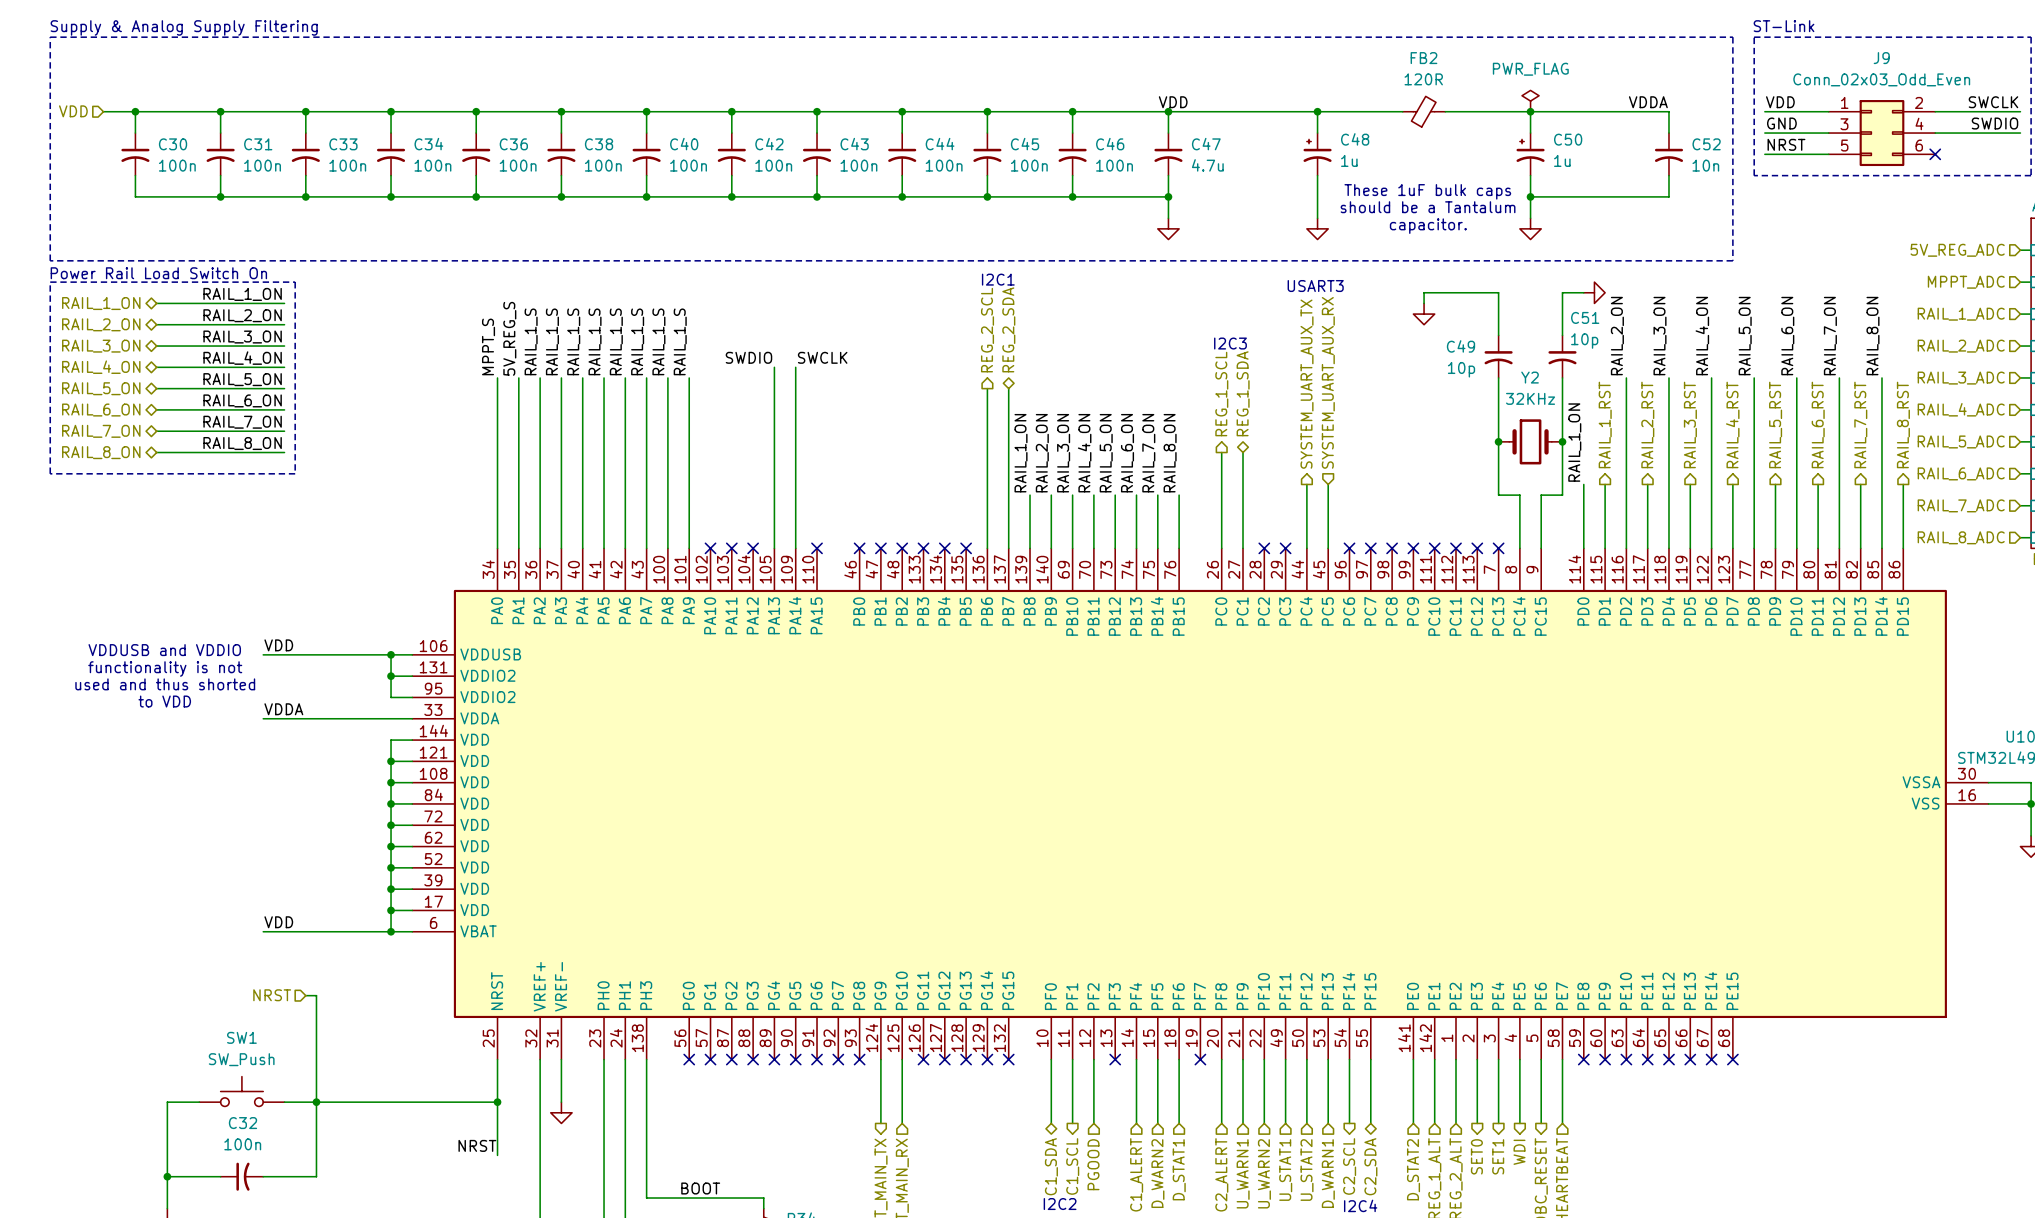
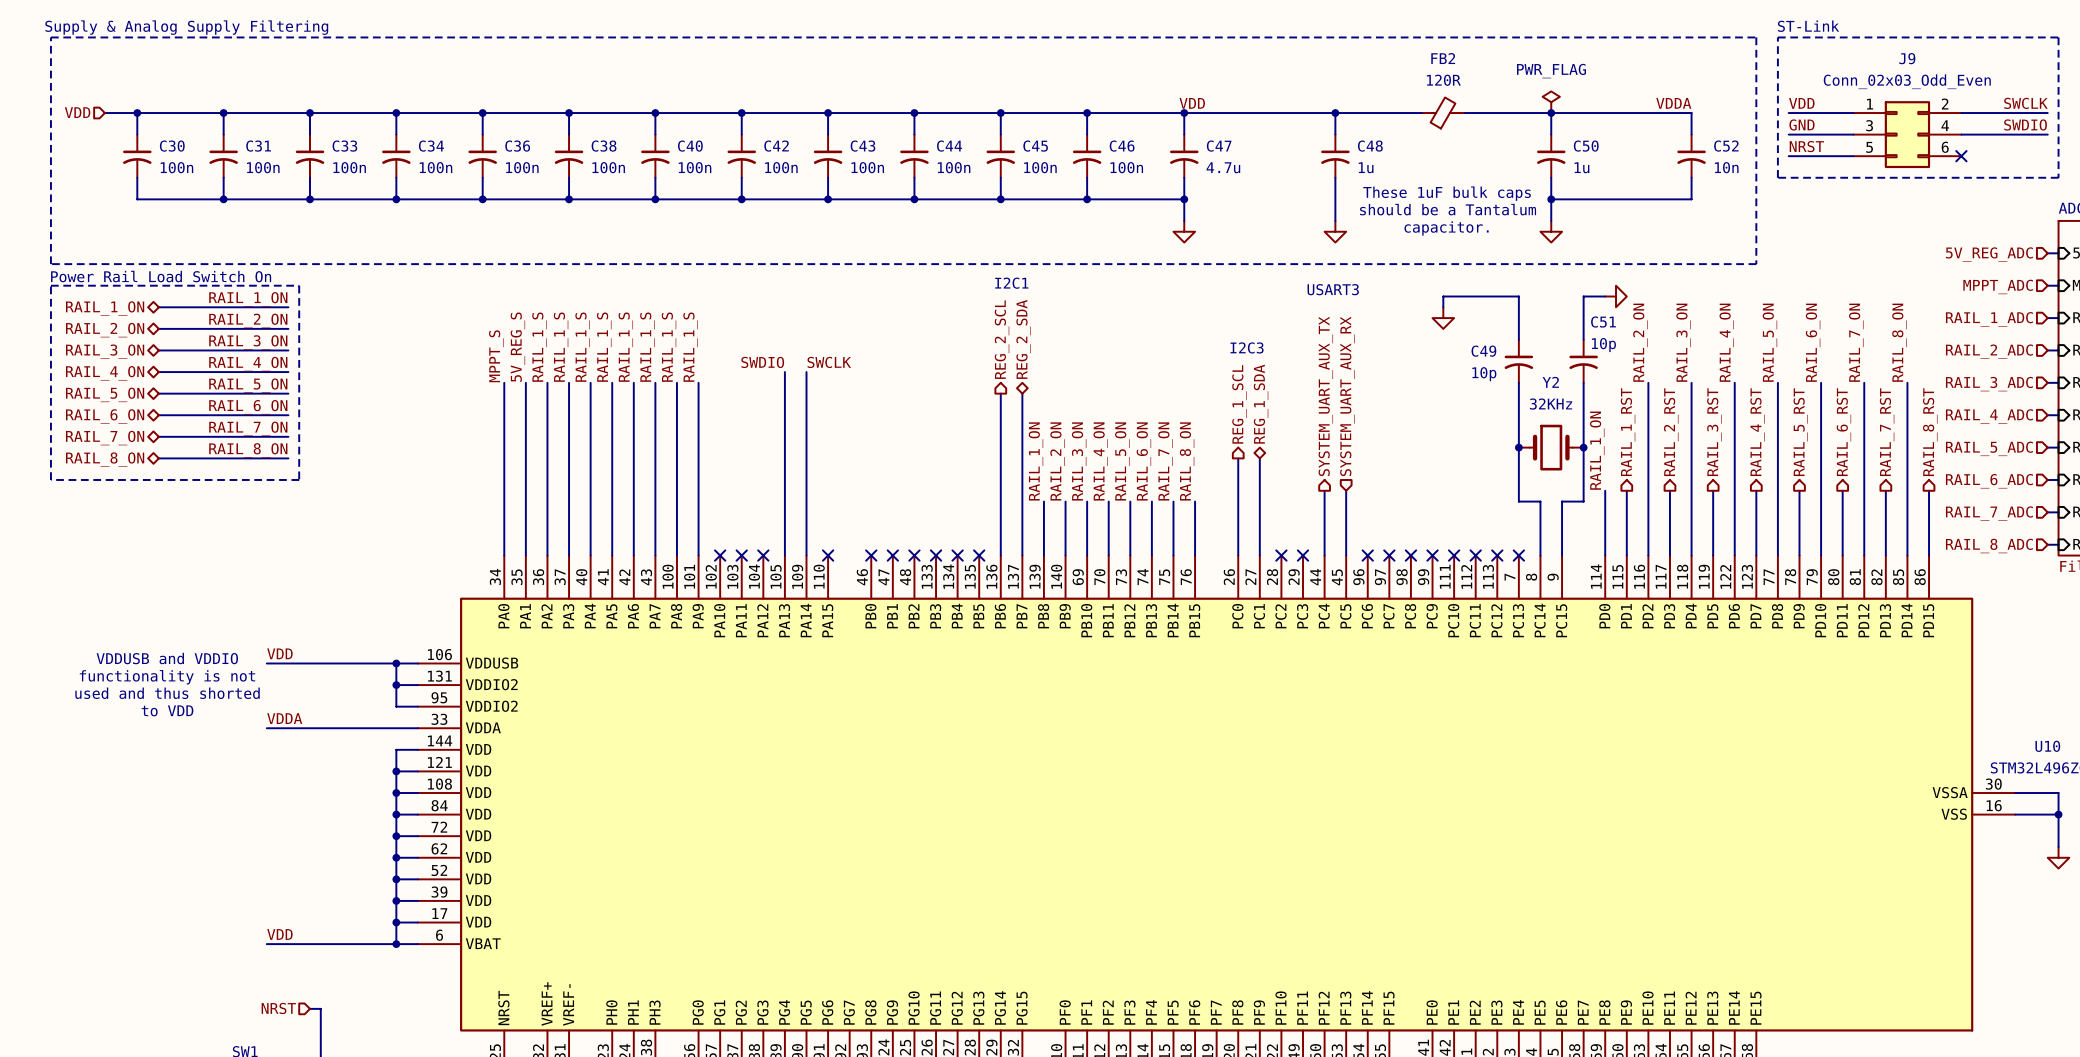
C48 symbol: [1303, 133, 1332, 176] -> [1321, 134, 1350, 178]
C50 symbol: [1516, 133, 1545, 176] -> [1537, 134, 1566, 178]

